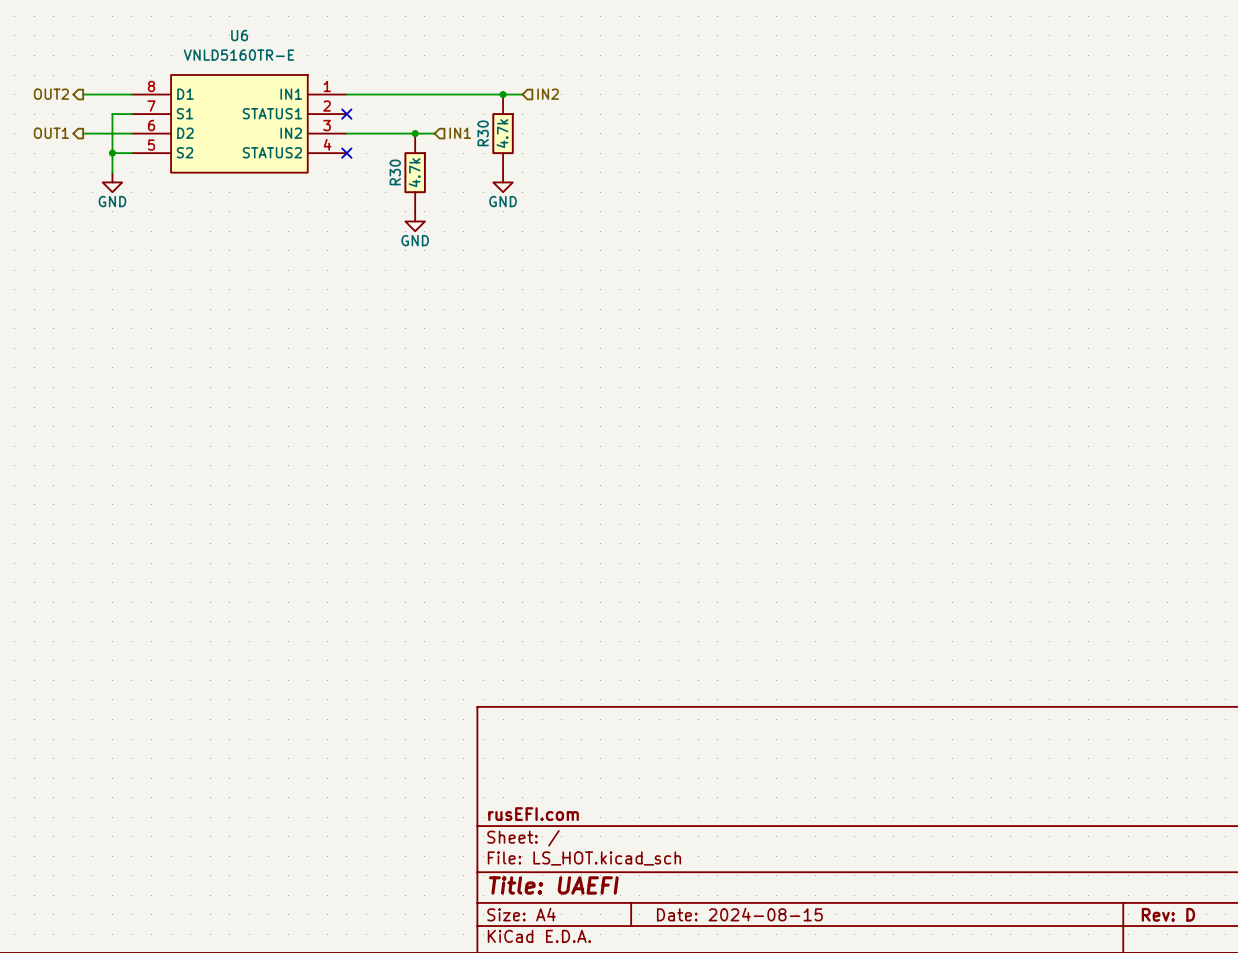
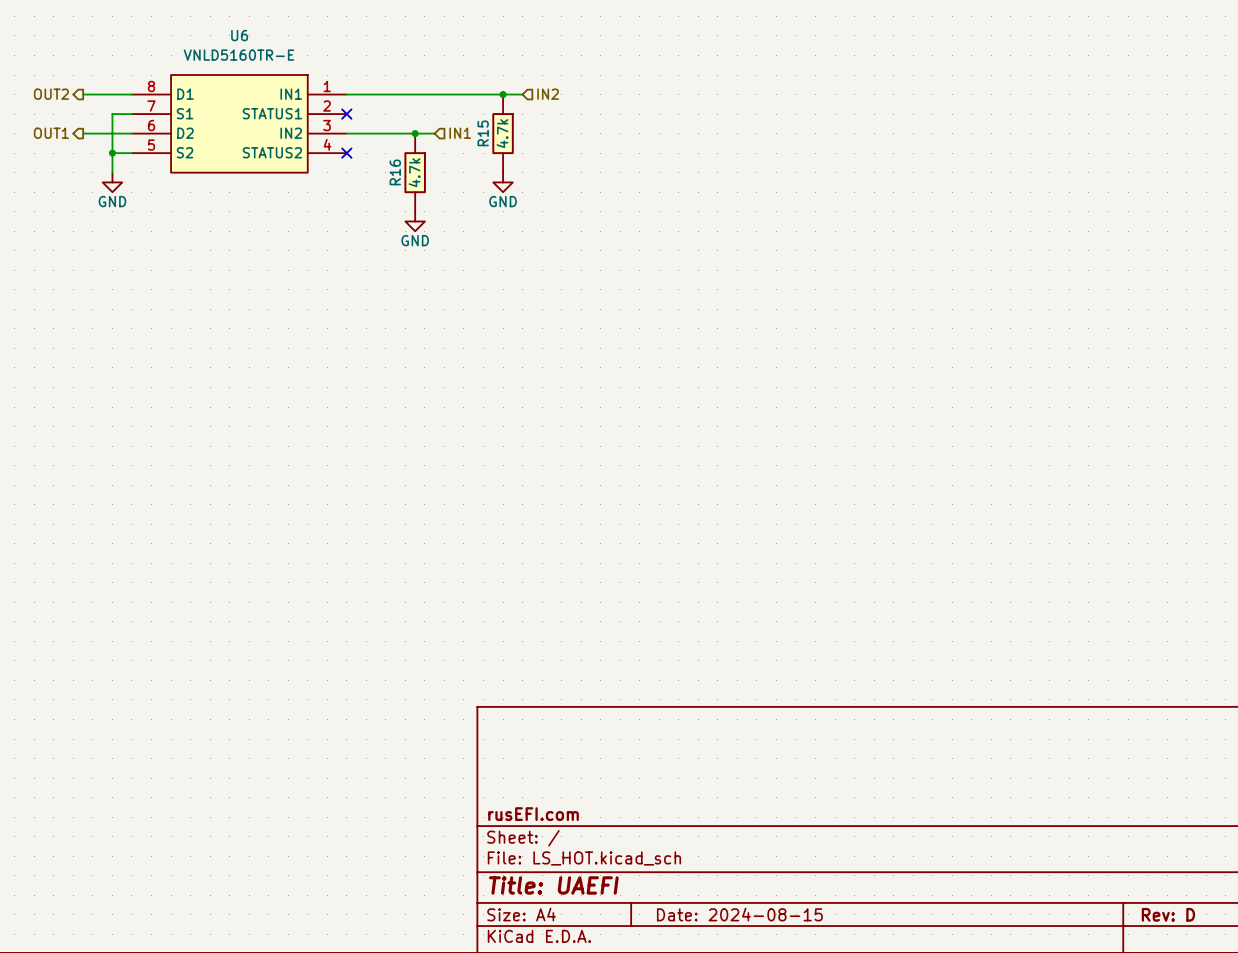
R30 name: R30 (483, 133) -> R15 (483, 133)
R30 name: R30 (395, 172) -> R16 (395, 172)

